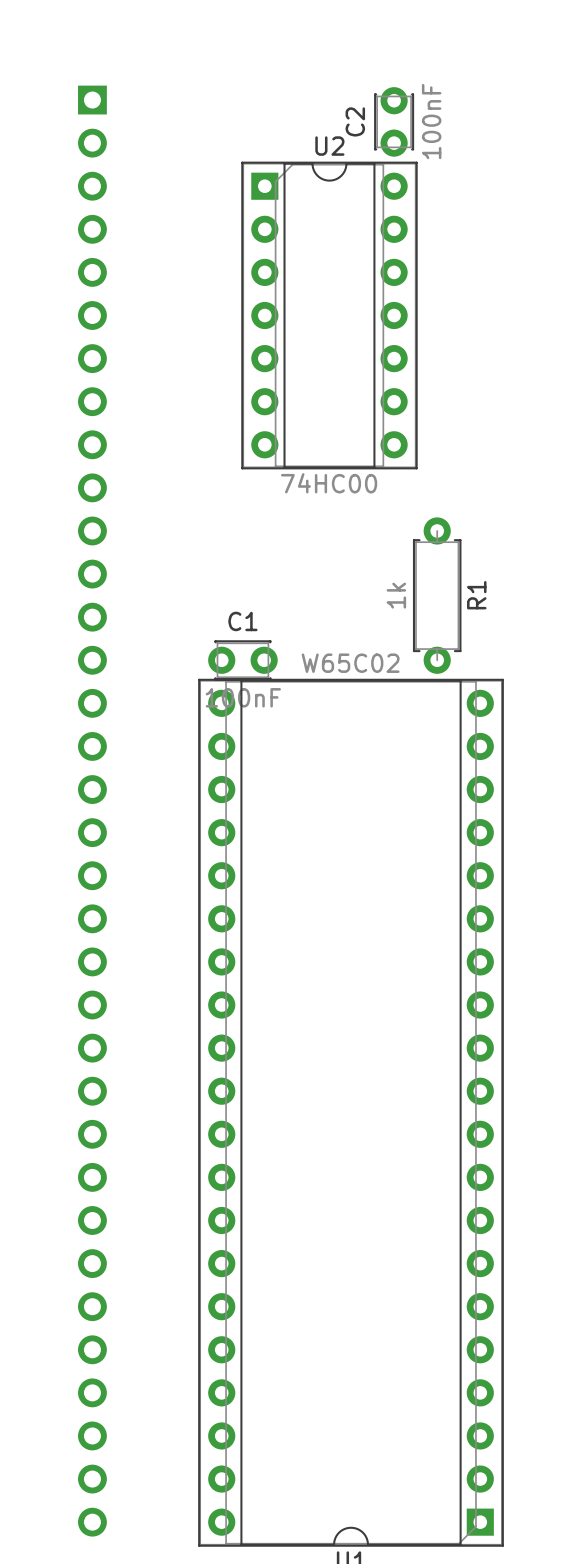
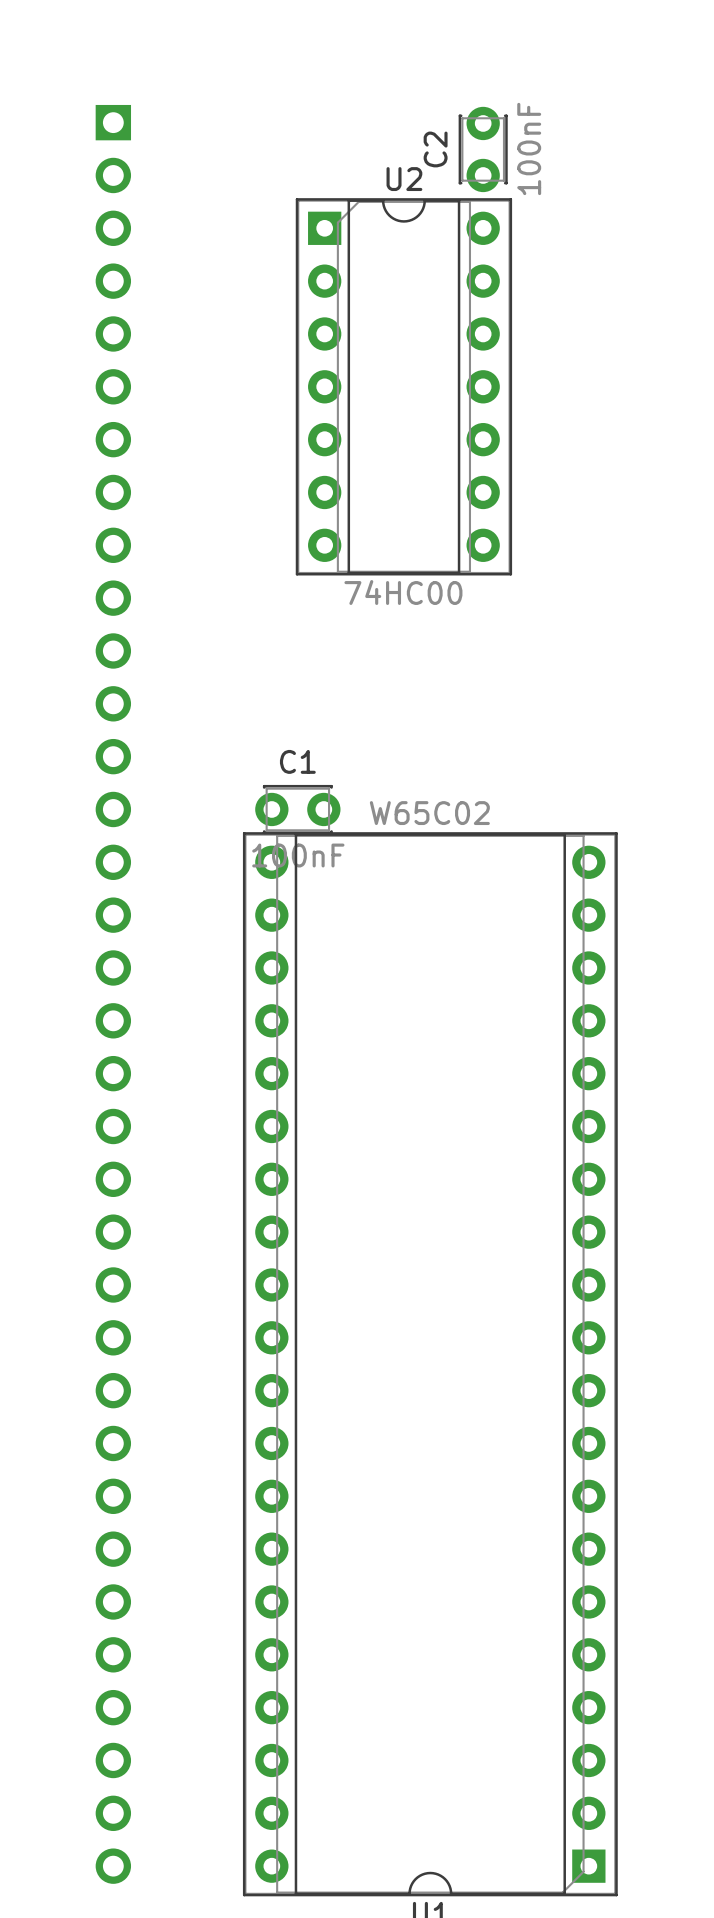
R1: 1k (437, 595) -> none

